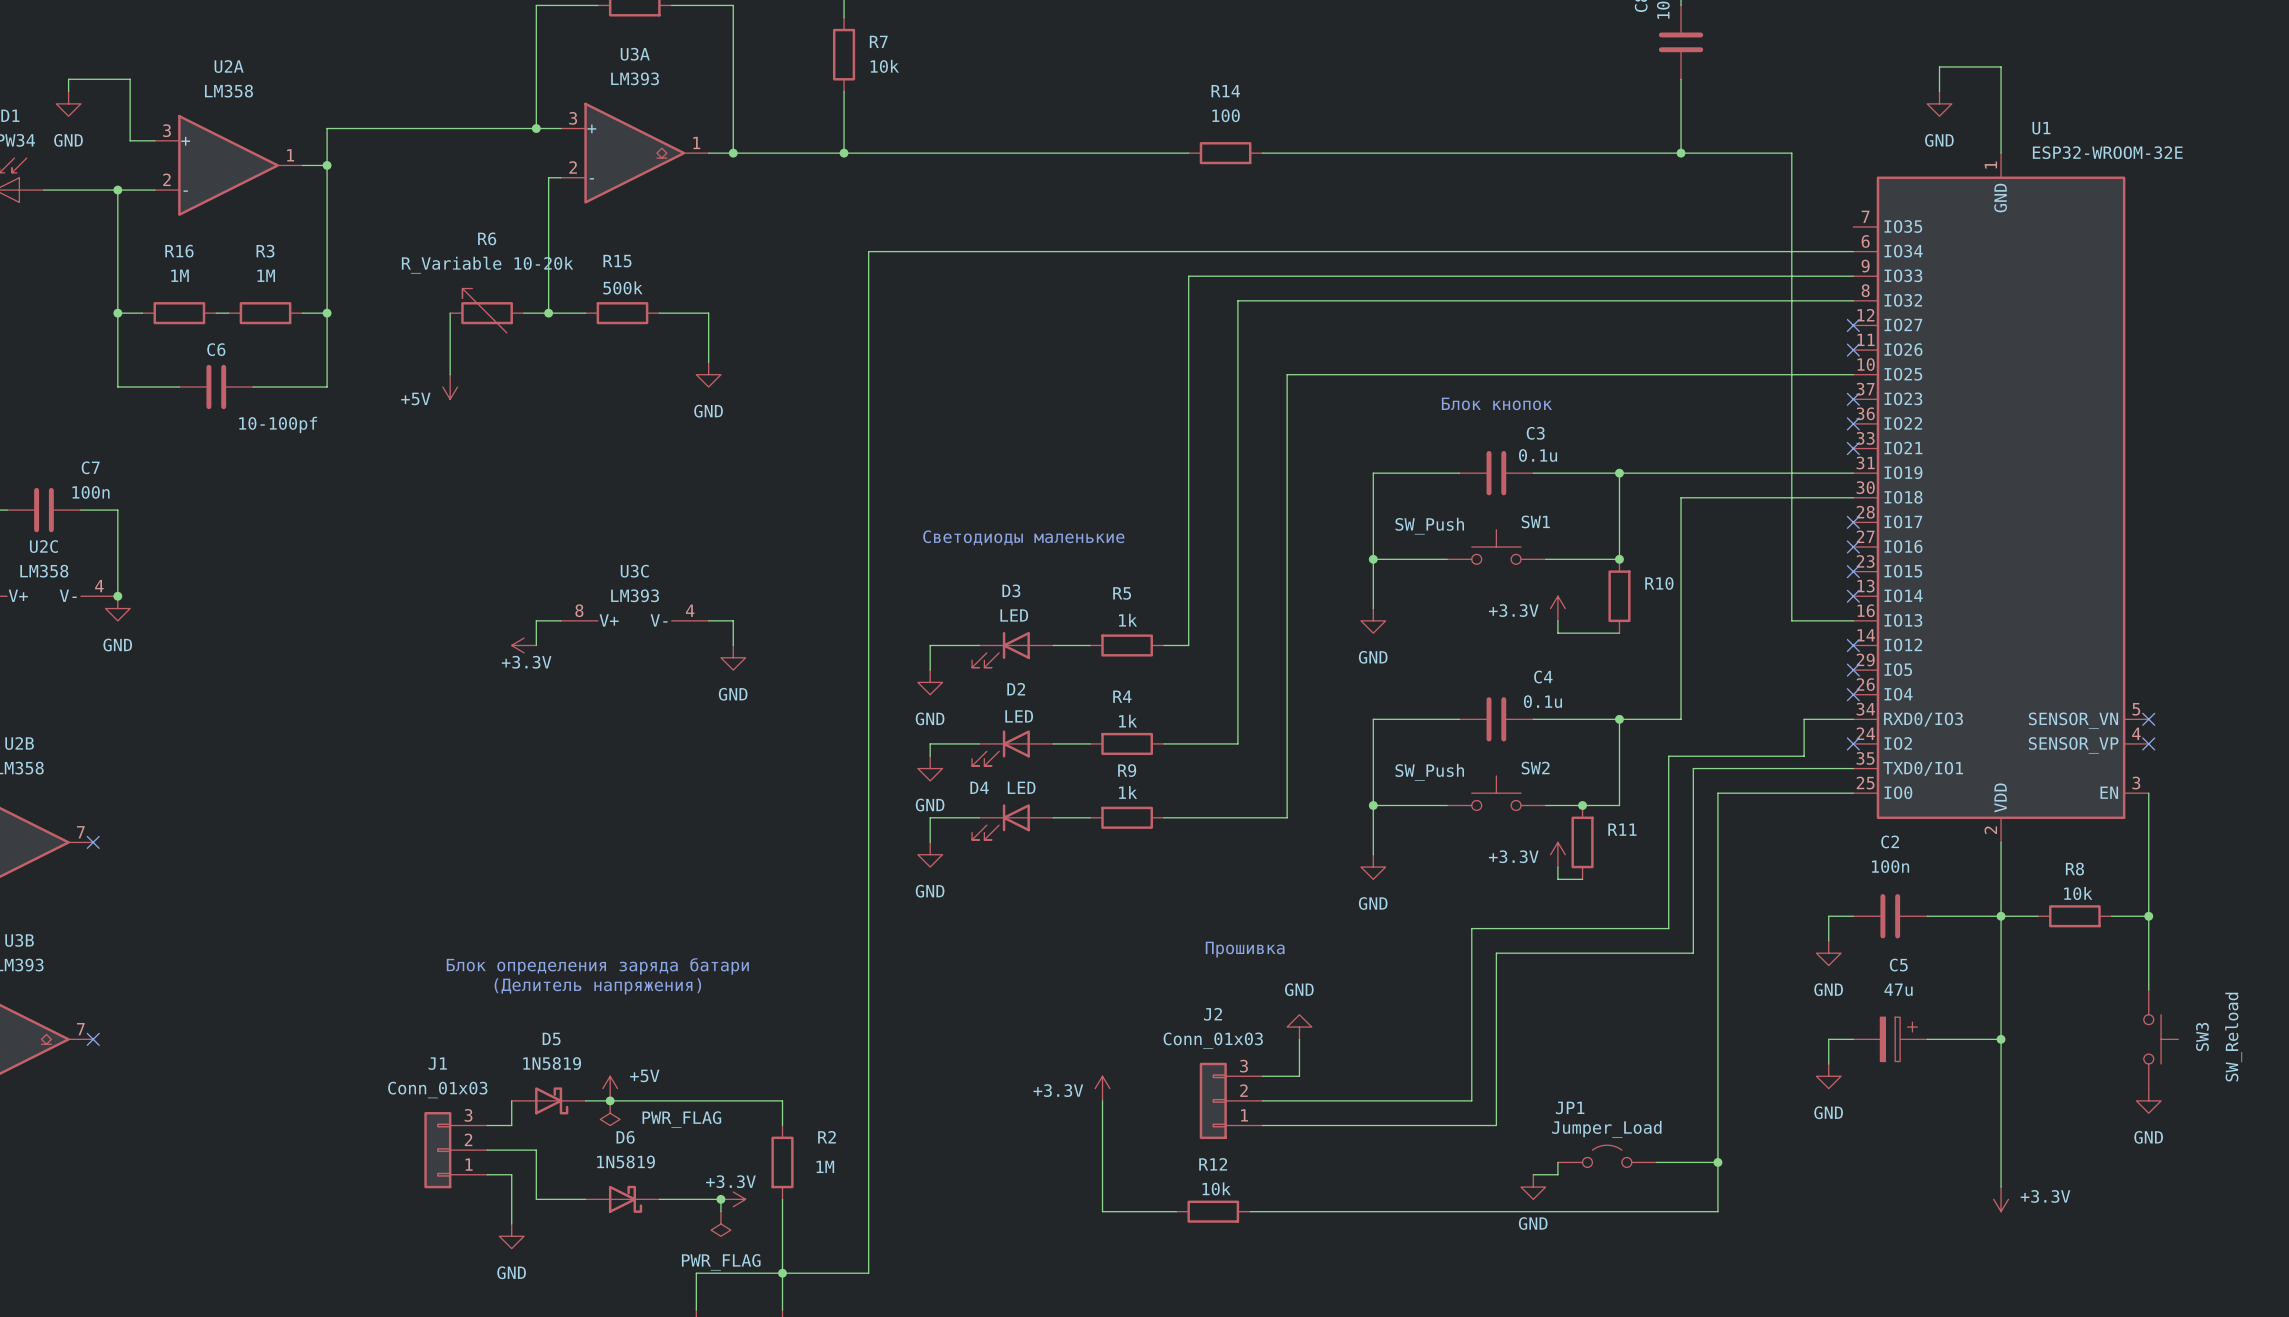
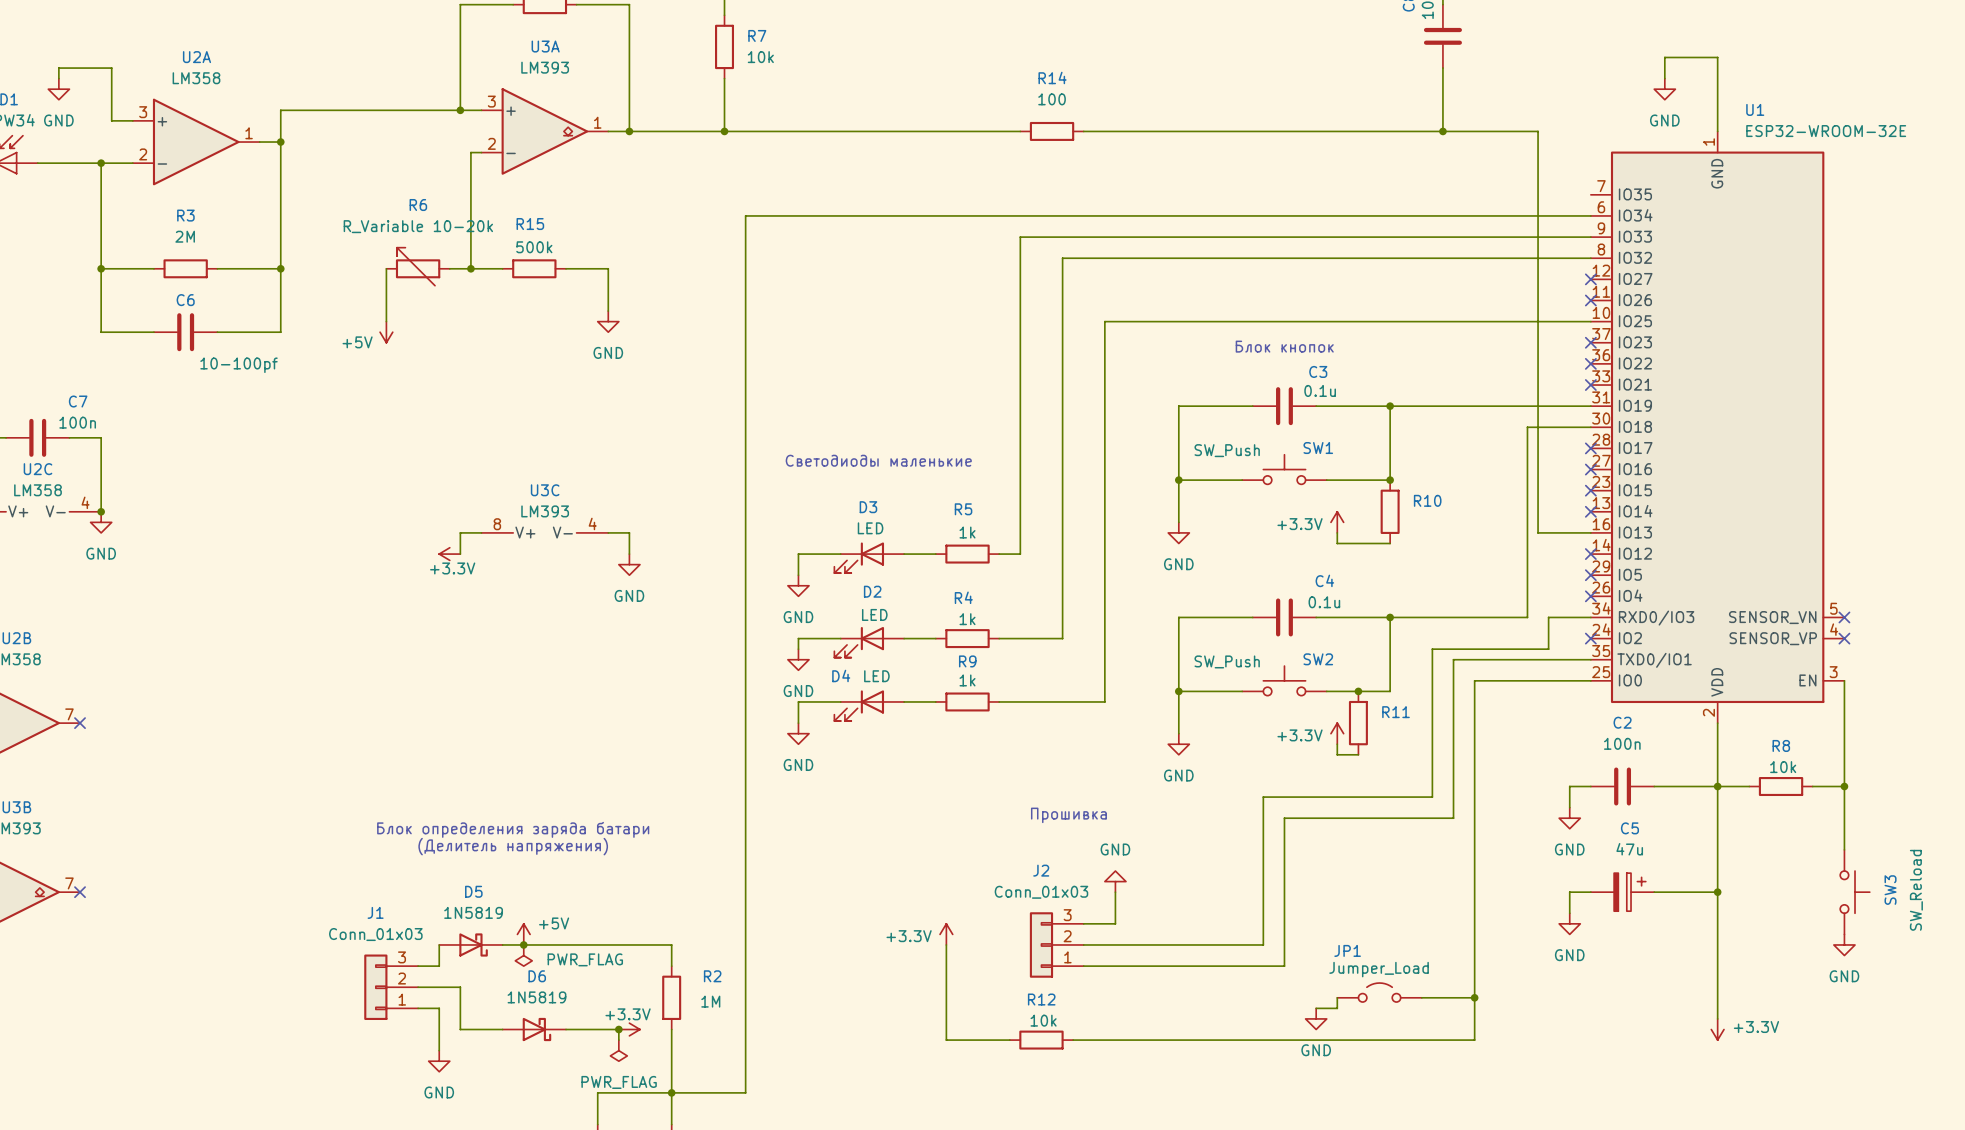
R3 value: 1М (266, 275) -> 2M (185, 236)
wire: none -> (122, 268) (153, 268)
R16: 1М (179, 313) -> none
wire: (216, 313) (228, 313) -> none
wire: none -> (217, 268) (259, 268)
R3 position: (265, 313) -> (185, 268)
wire: (1779, 497) (1681, 497) (1681, 719) -> (1527, 427) (1527, 617) (1442, 617)

